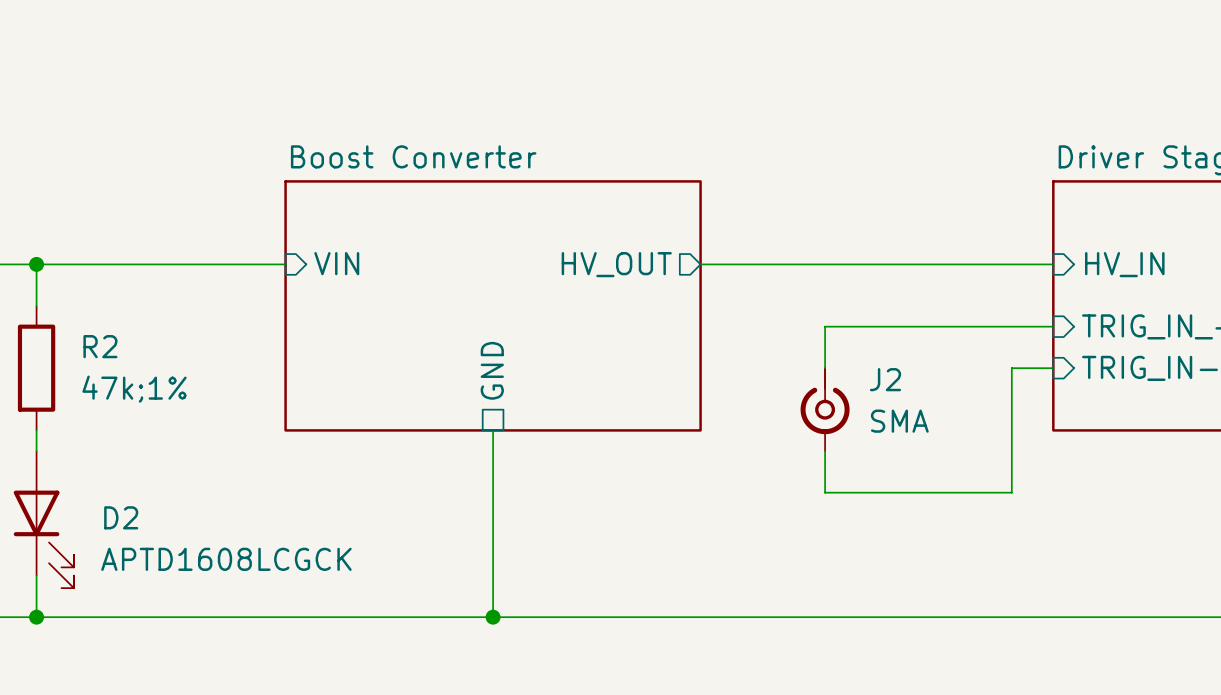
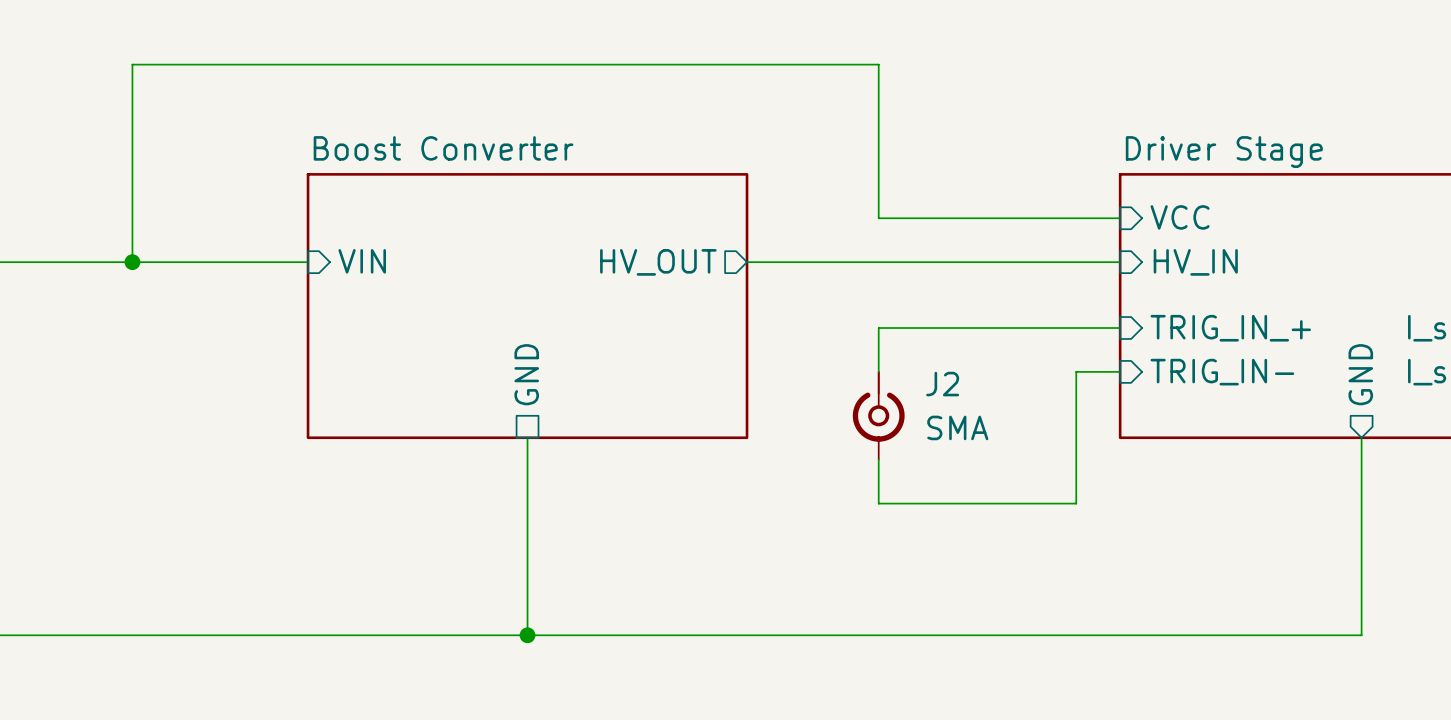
wire: none -> (1120, 218) (878, 218) (878, 64) (132, 64) (132, 262)
sheet pin: none -> VCC (1180, 217)
wire: (36, 264) (36, 305) -> none
junction position: (36, 264) -> (132, 262)
R2: 47k;1% (36, 368) -> none
wire: (36, 430) (36, 451) -> none
D2: APTD1608LCGCK (43, 519) -> none
wire: (36, 575) (36, 617) -> none
junction: (36, 617) -> none

